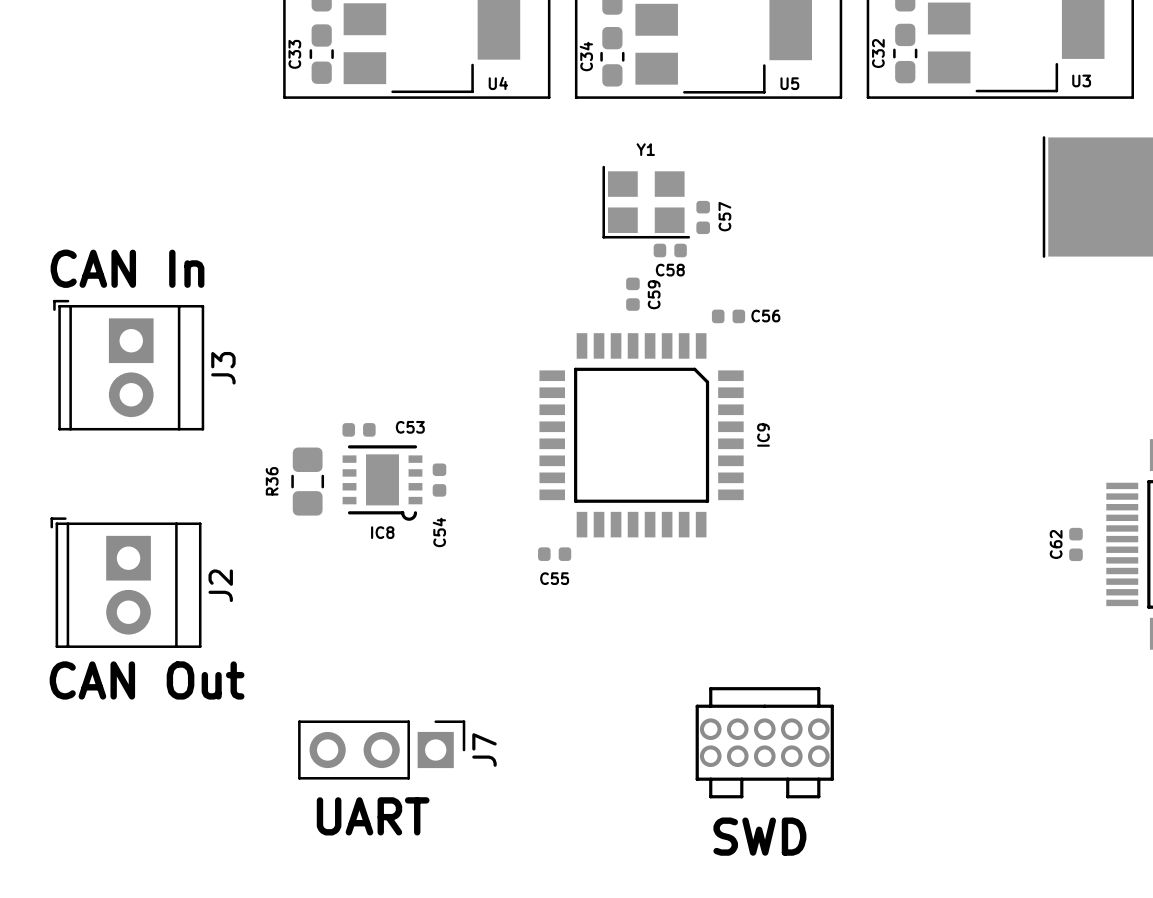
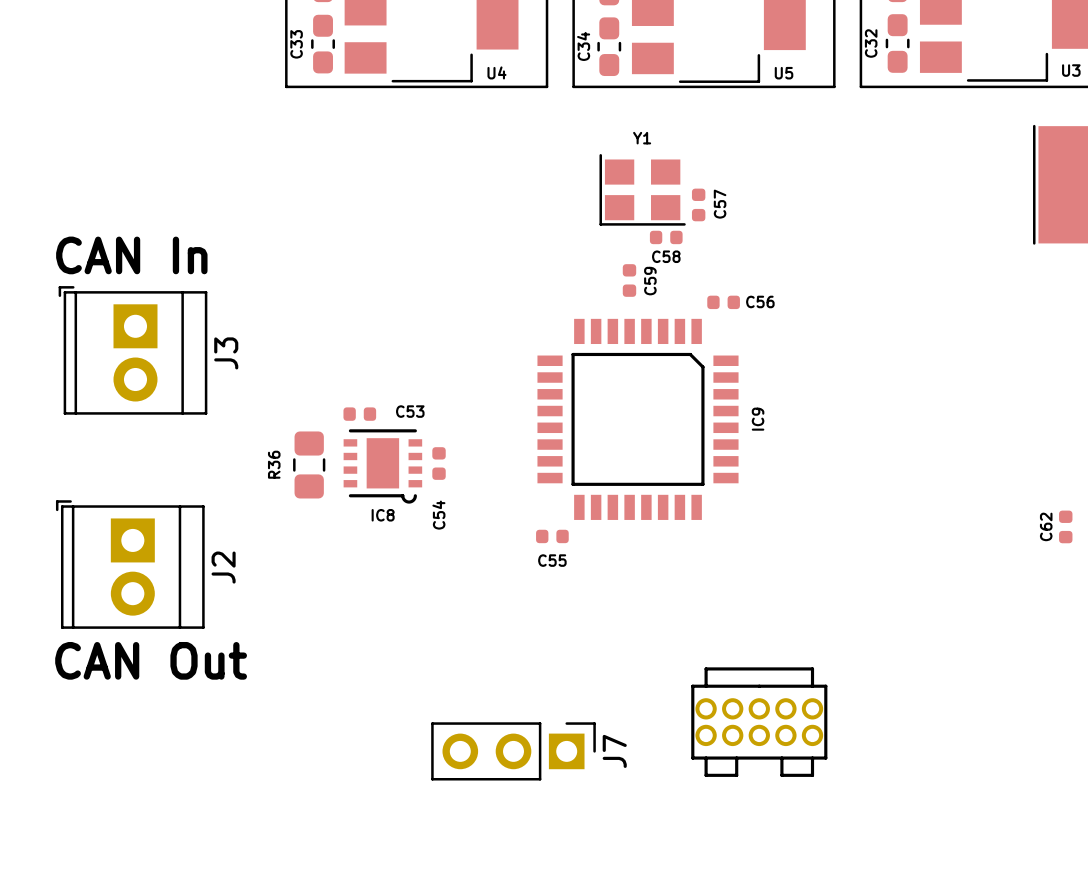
J7 position: (381, 750) -> (513, 751)
text: UART (373, 816) -> none
text: SWD (759, 836) -> none

